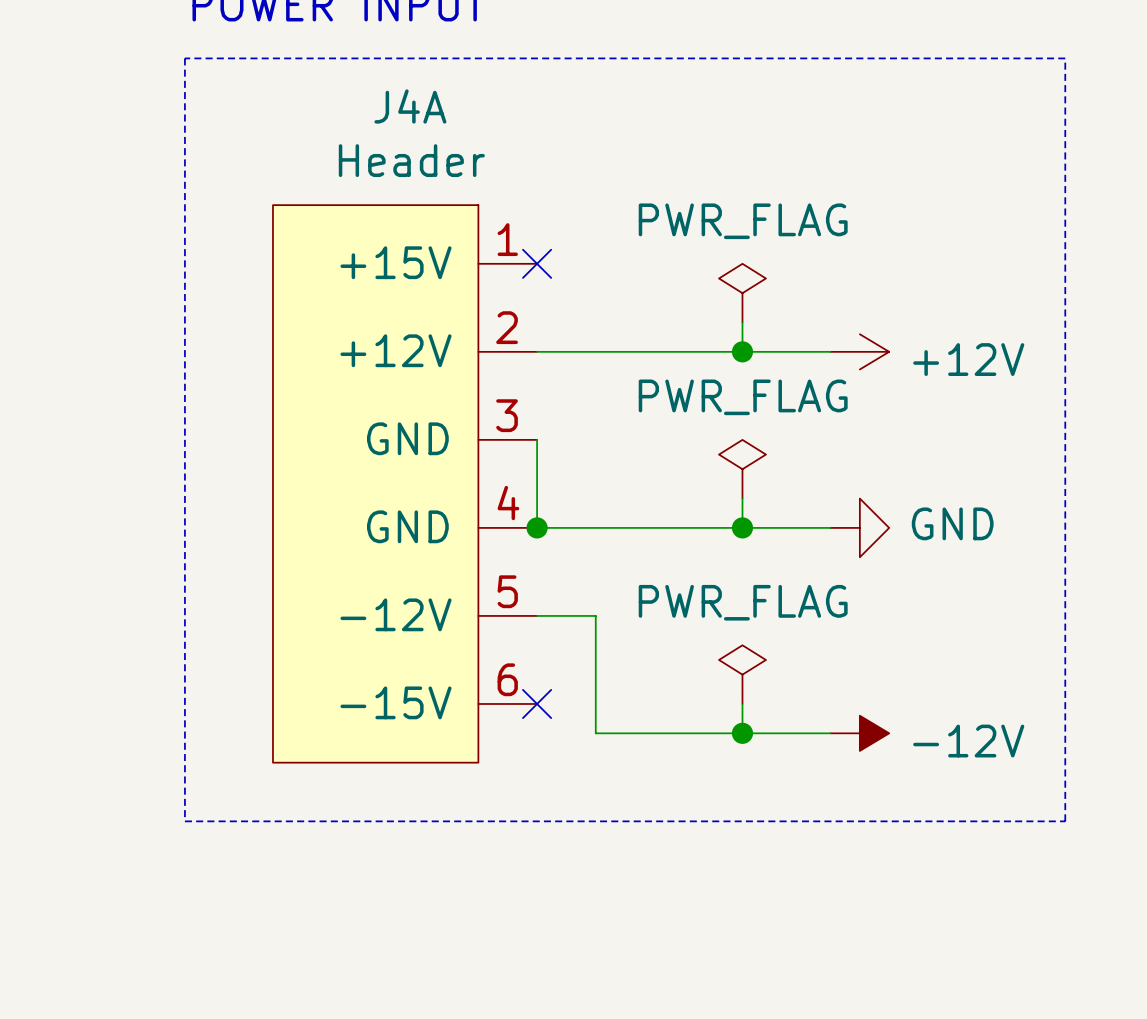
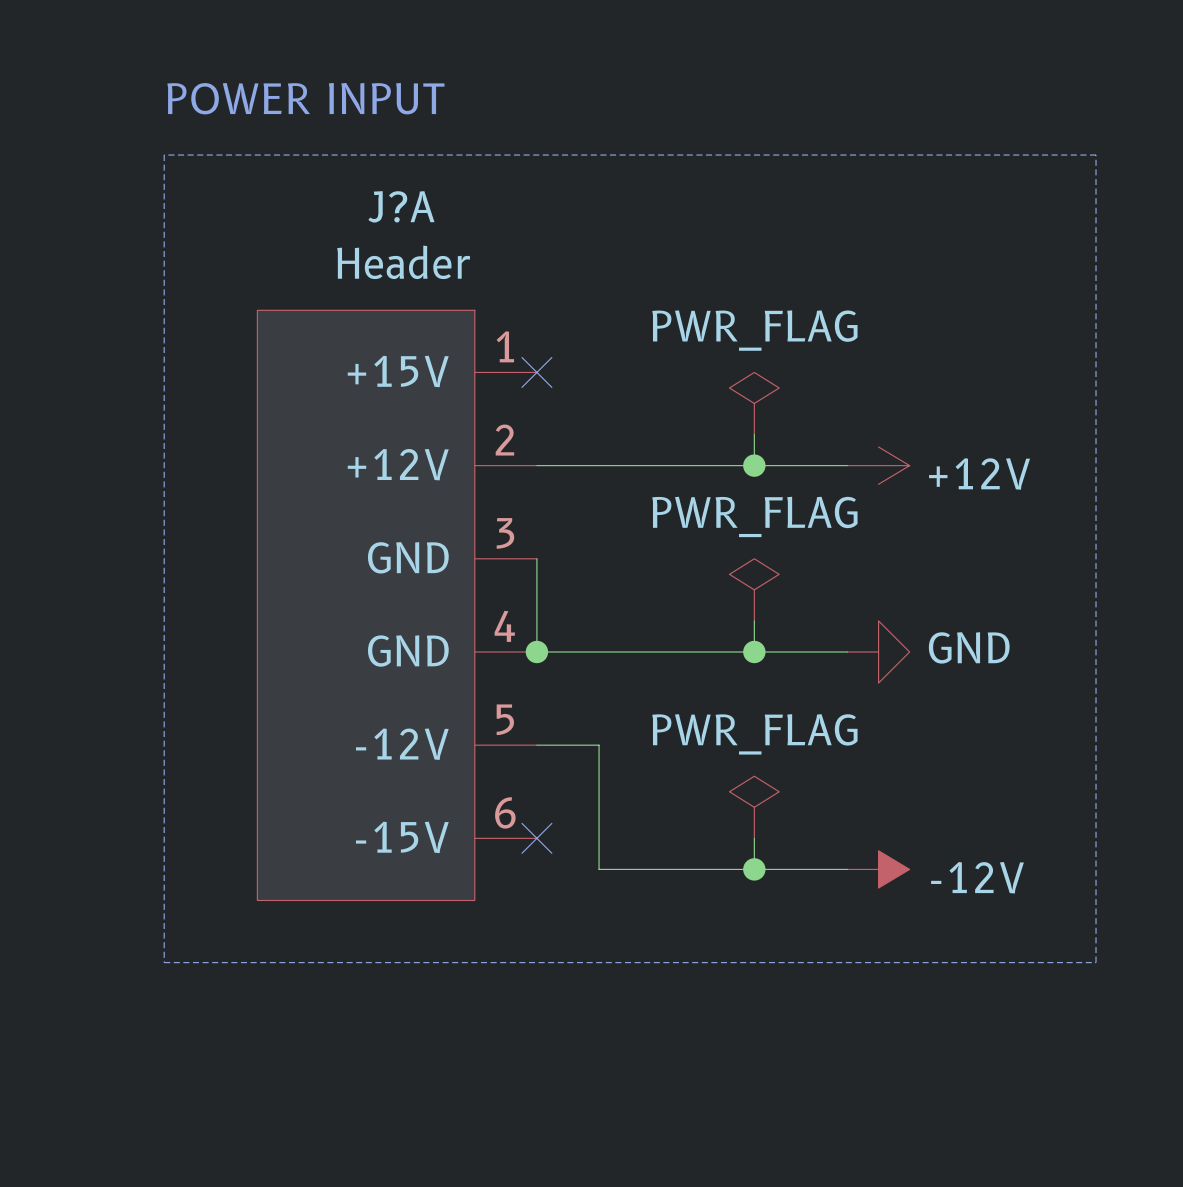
J4A name: J4A (410, 106) -> J?A (401, 206)

